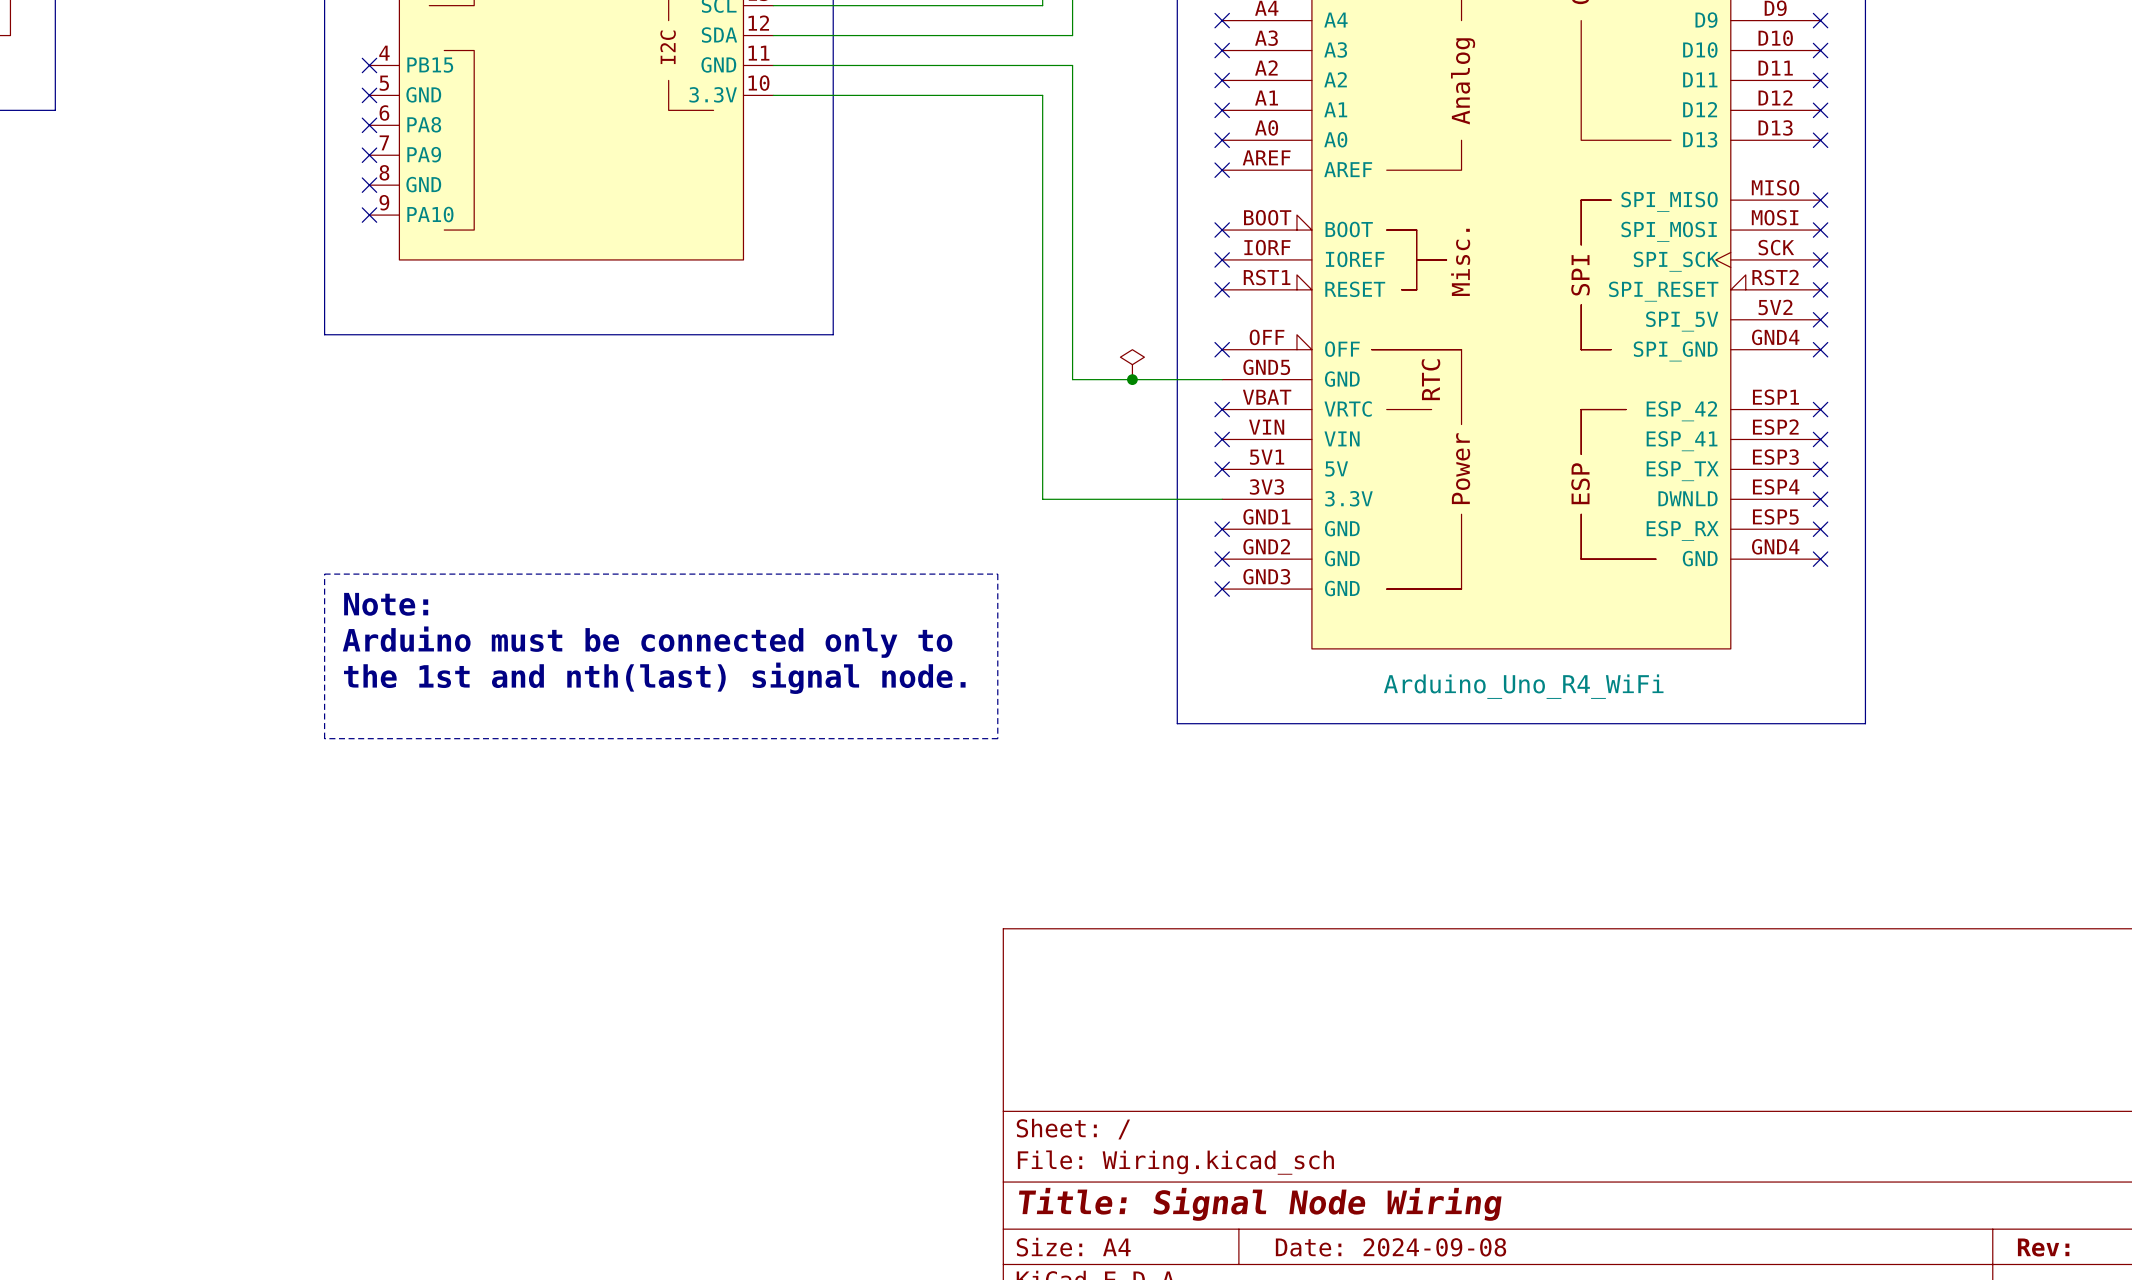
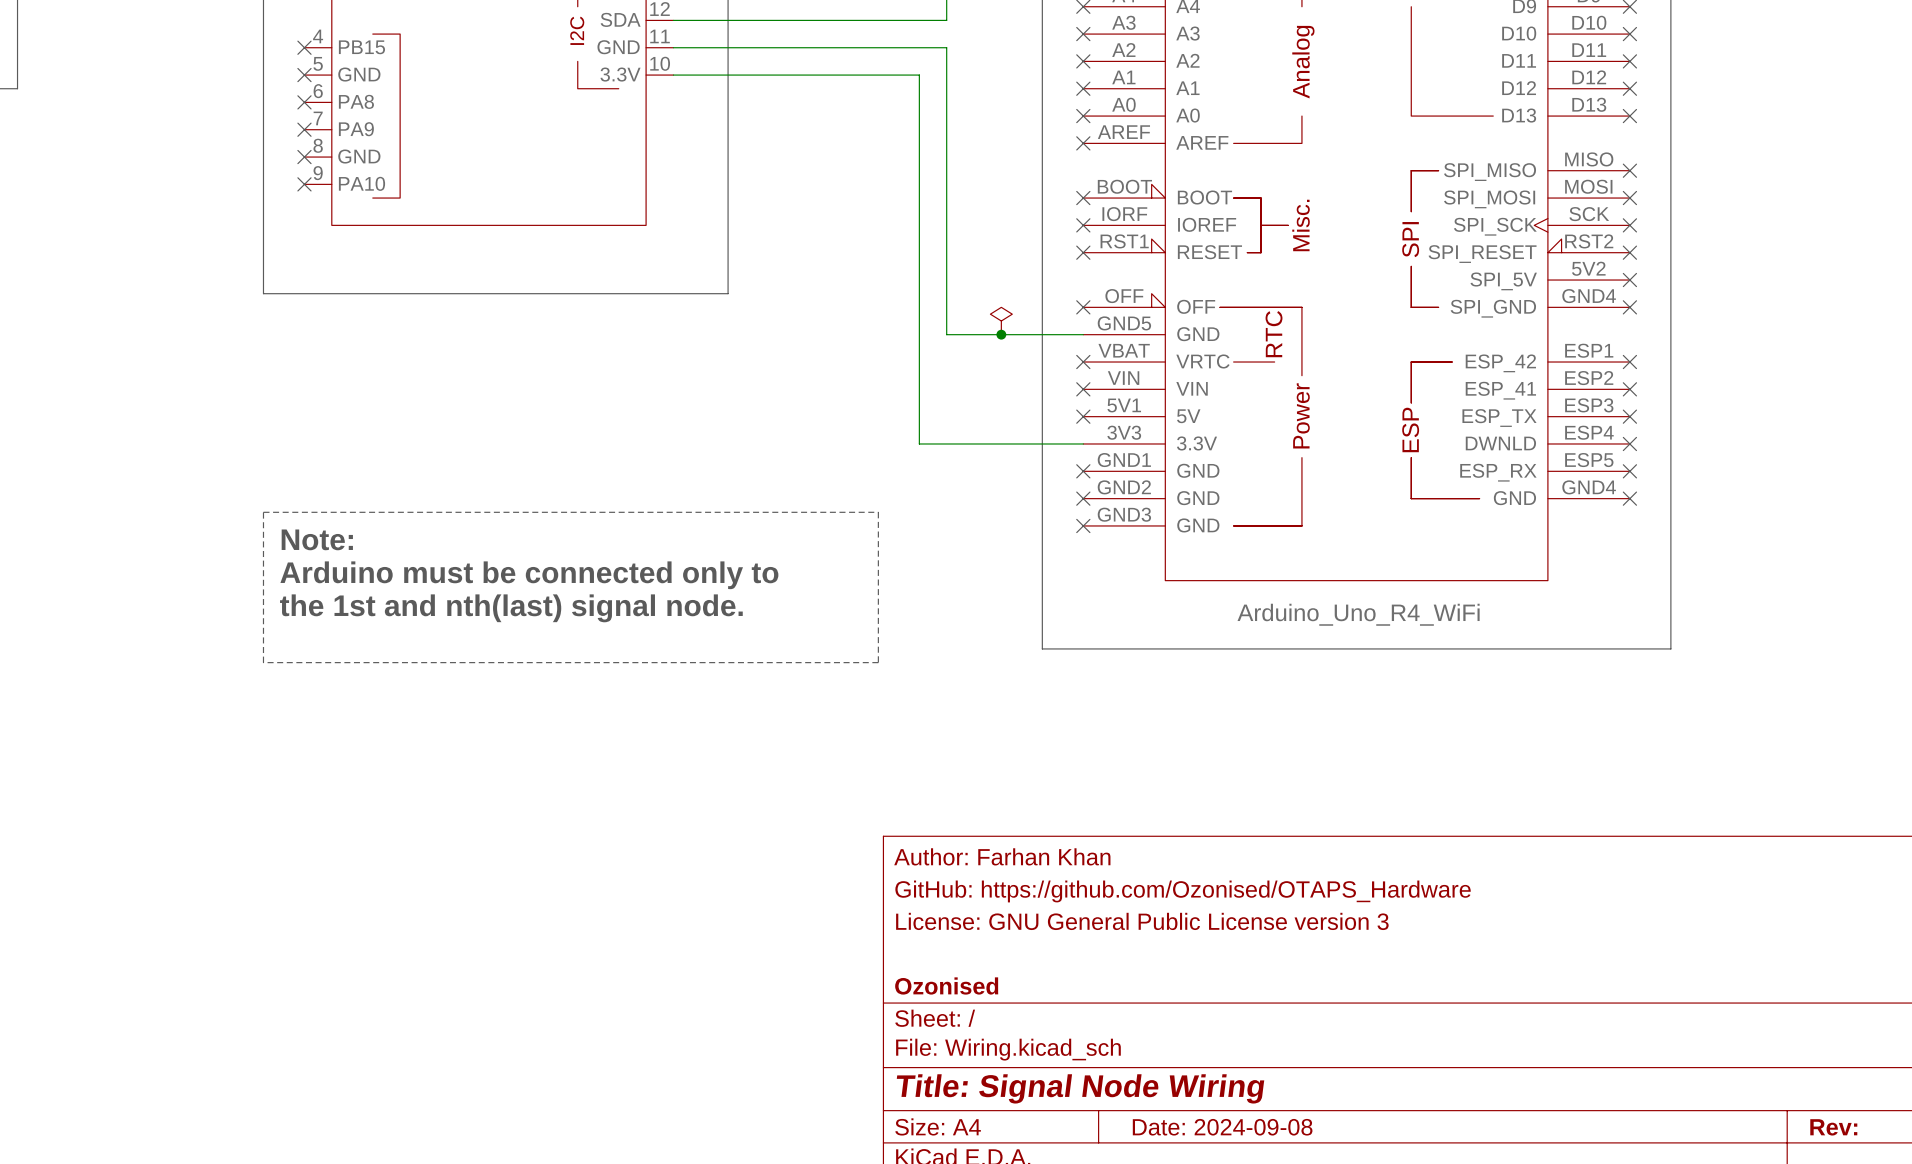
title block: none -> Author: Farhan Khan (1002, 856)
title block: none -> GitHub: https://github.com/Ozonised/OTAPS_Hardware (1183, 891)
title block: none -> License: GNU General Public License version 3 (1142, 921)
title block: none -> Ozonised (946, 985)

